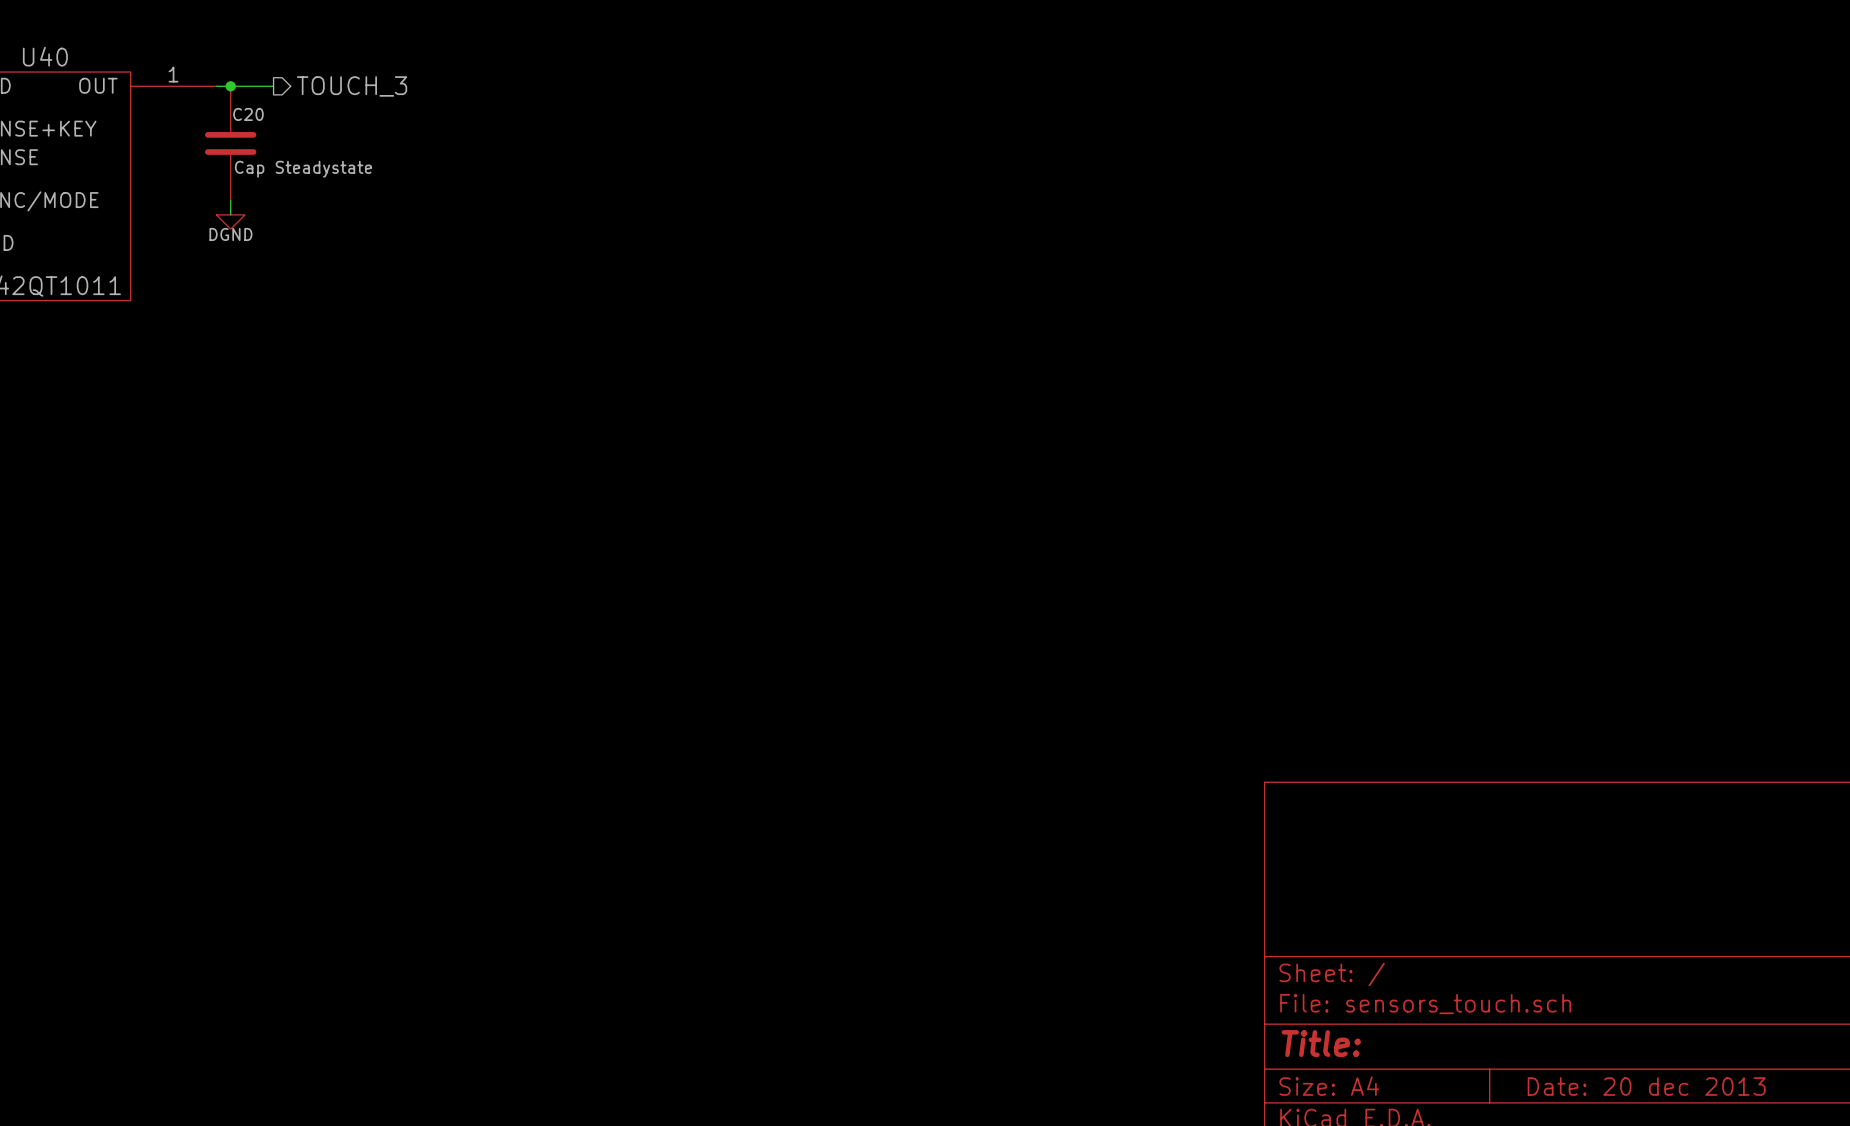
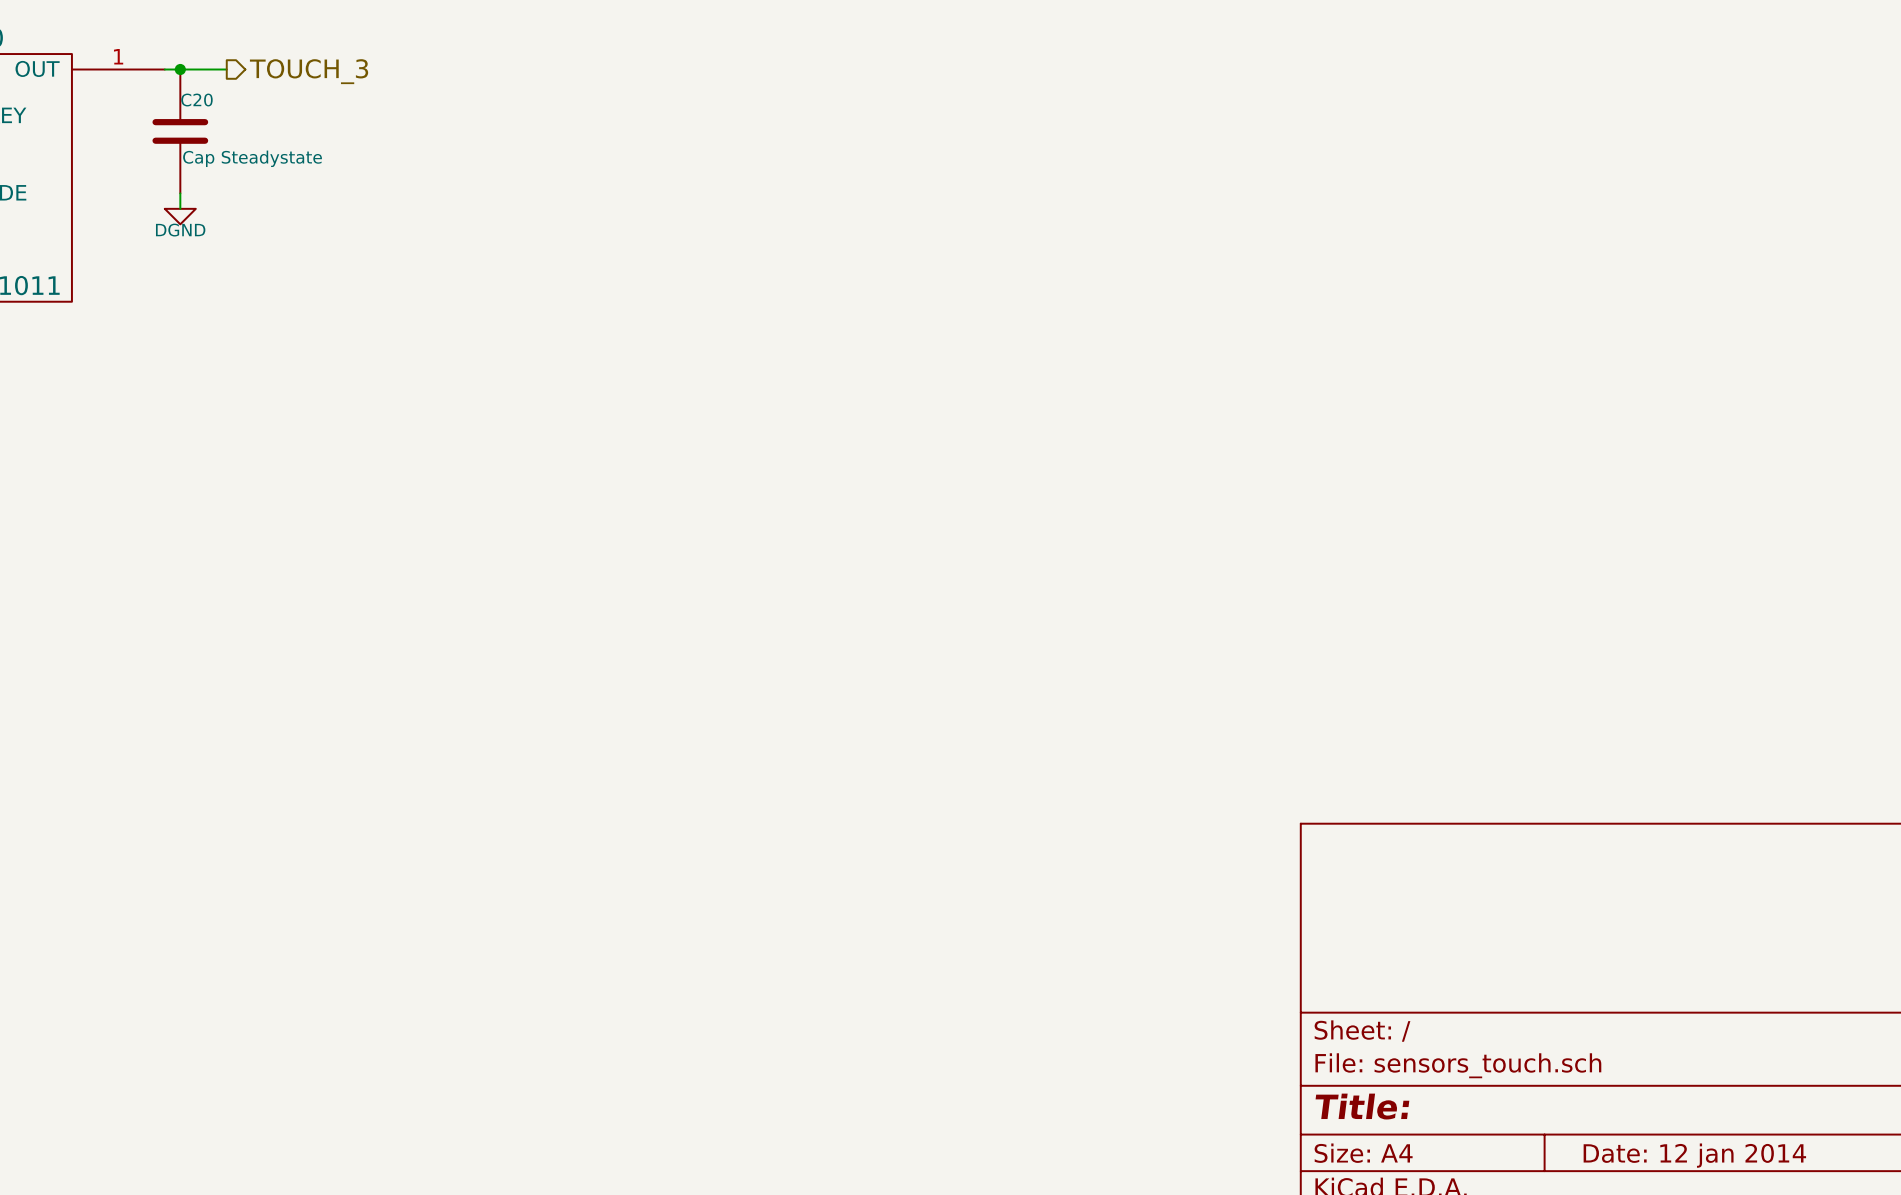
title block: Date: 20 dec 2013 (1646, 1086) -> Date: 12 jan 2014 (1694, 1155)

